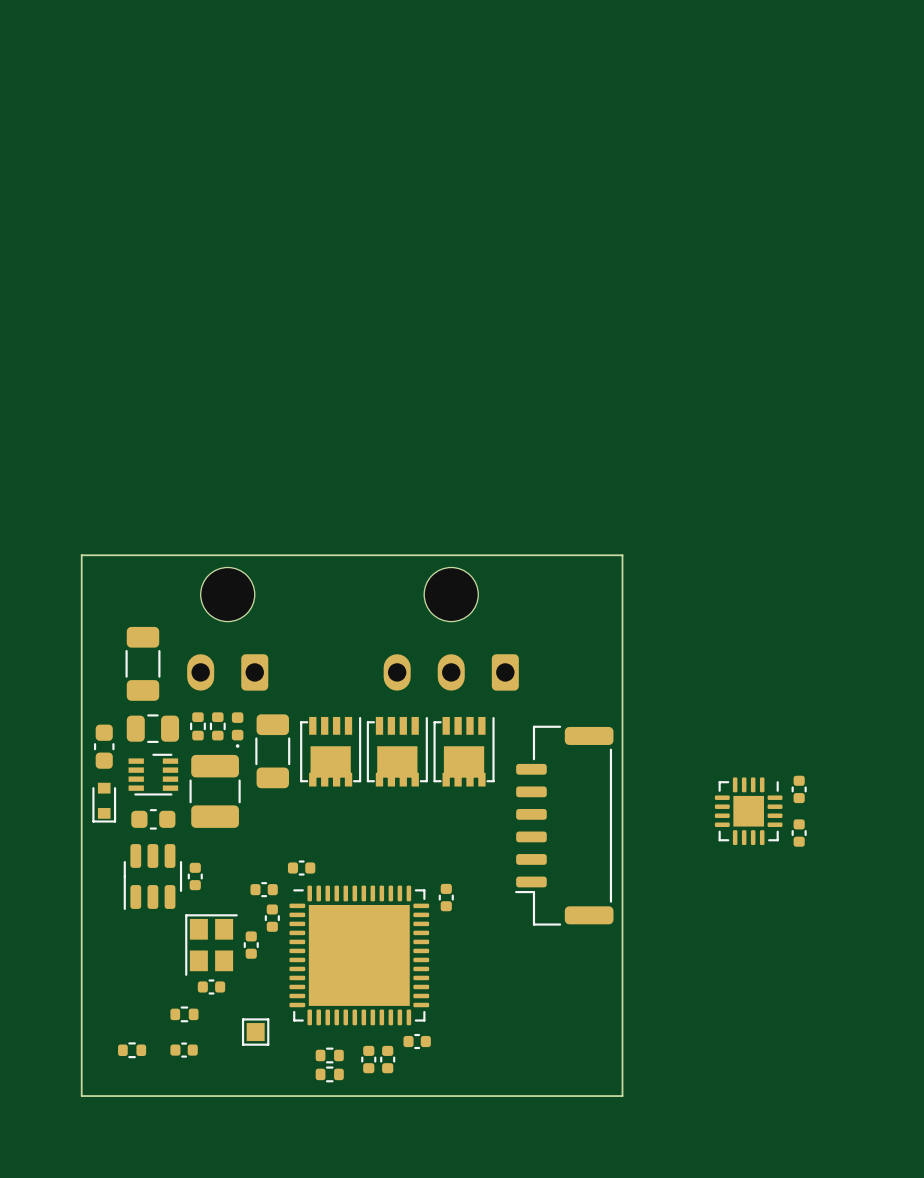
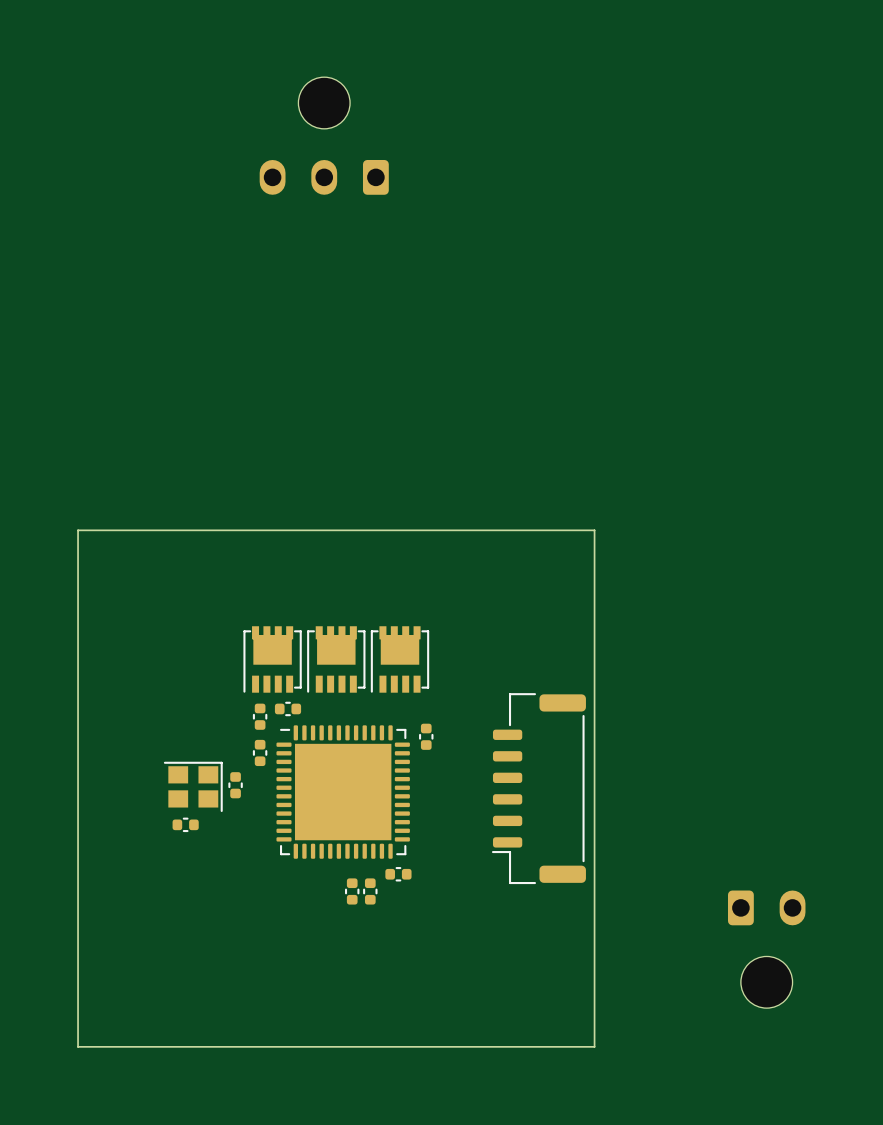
part: none -> (324, 135)
part: (227, 629) -> none
part: (451, 629) -> none
part: (142, 663) -> none
part: none -> (272, 659)
part: none -> (336, 659)
part: none -> (400, 659)
part footprint: [255, 714, 291, 789] -> [252, 703, 268, 730]
part: (197, 726) -> none
part: (217, 726) -> none
part: (152, 728) -> none
part: (237, 730) -> none
part: none -> (288, 708)
part: (104, 746) -> none
part: (330, 751) -> none
part: (397, 751) -> none
part: (464, 751) -> none
part: none -> (426, 736)
part: (153, 774) -> none
part: none -> (260, 752)
part: (799, 789) -> none
part: (215, 791) -> none
part: (104, 802) -> none
part: (748, 811) -> none
part: (153, 819) -> none
part: none -> (235, 785)
part: (799, 833) -> none
part: (301, 868) -> none
part rotation: 0° (195, 876) -> 90° clockwise (185, 824)
part: (152, 877) -> none
part: (264, 889) -> none
part rotation: 0° (446, 897) -> 90° clockwise (398, 874)
part position: (446, 897) -> (398, 874)
part: (272, 918) -> none
part: none -> (352, 891)
part: none -> (370, 891)
part rotation: 0° (211, 945) -> 90° clockwise (193, 786)
part position: (211, 945) -> (193, 786)
part: (251, 945) -> none
part position: (359, 955) -> (343, 792)
part: (211, 986) -> none
part: none -> (766, 949)
part: (184, 1014) -> none
part: (255, 1032) -> none
part: (417, 1041) -> none
part: (132, 1050) -> none
part: (184, 1050) -> none
part: (329, 1055) -> none
part: (368, 1059) -> none
part: (387, 1059) -> none
part: (329, 1074) -> none

